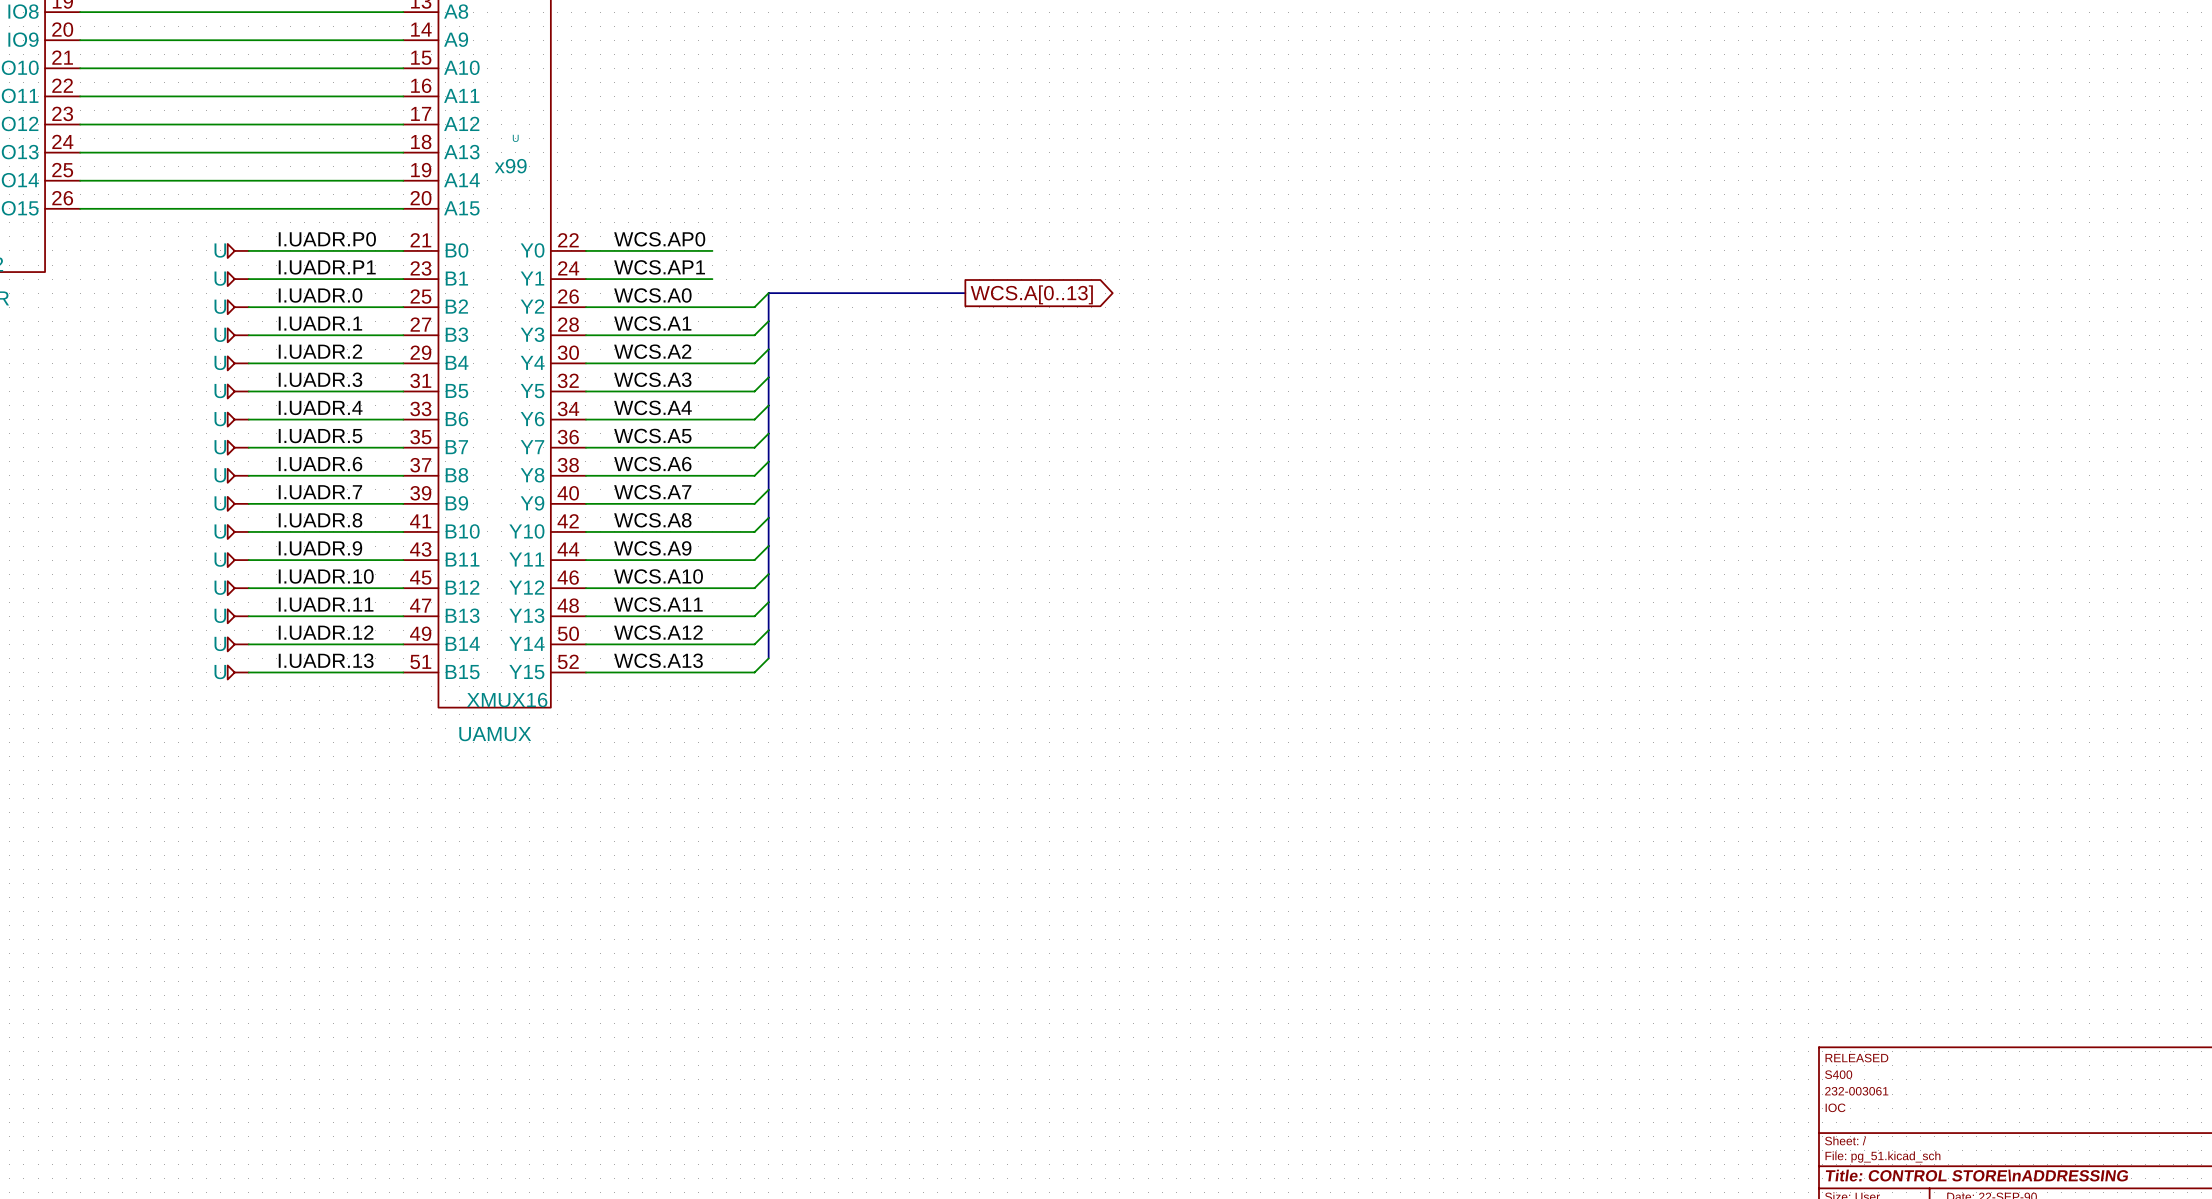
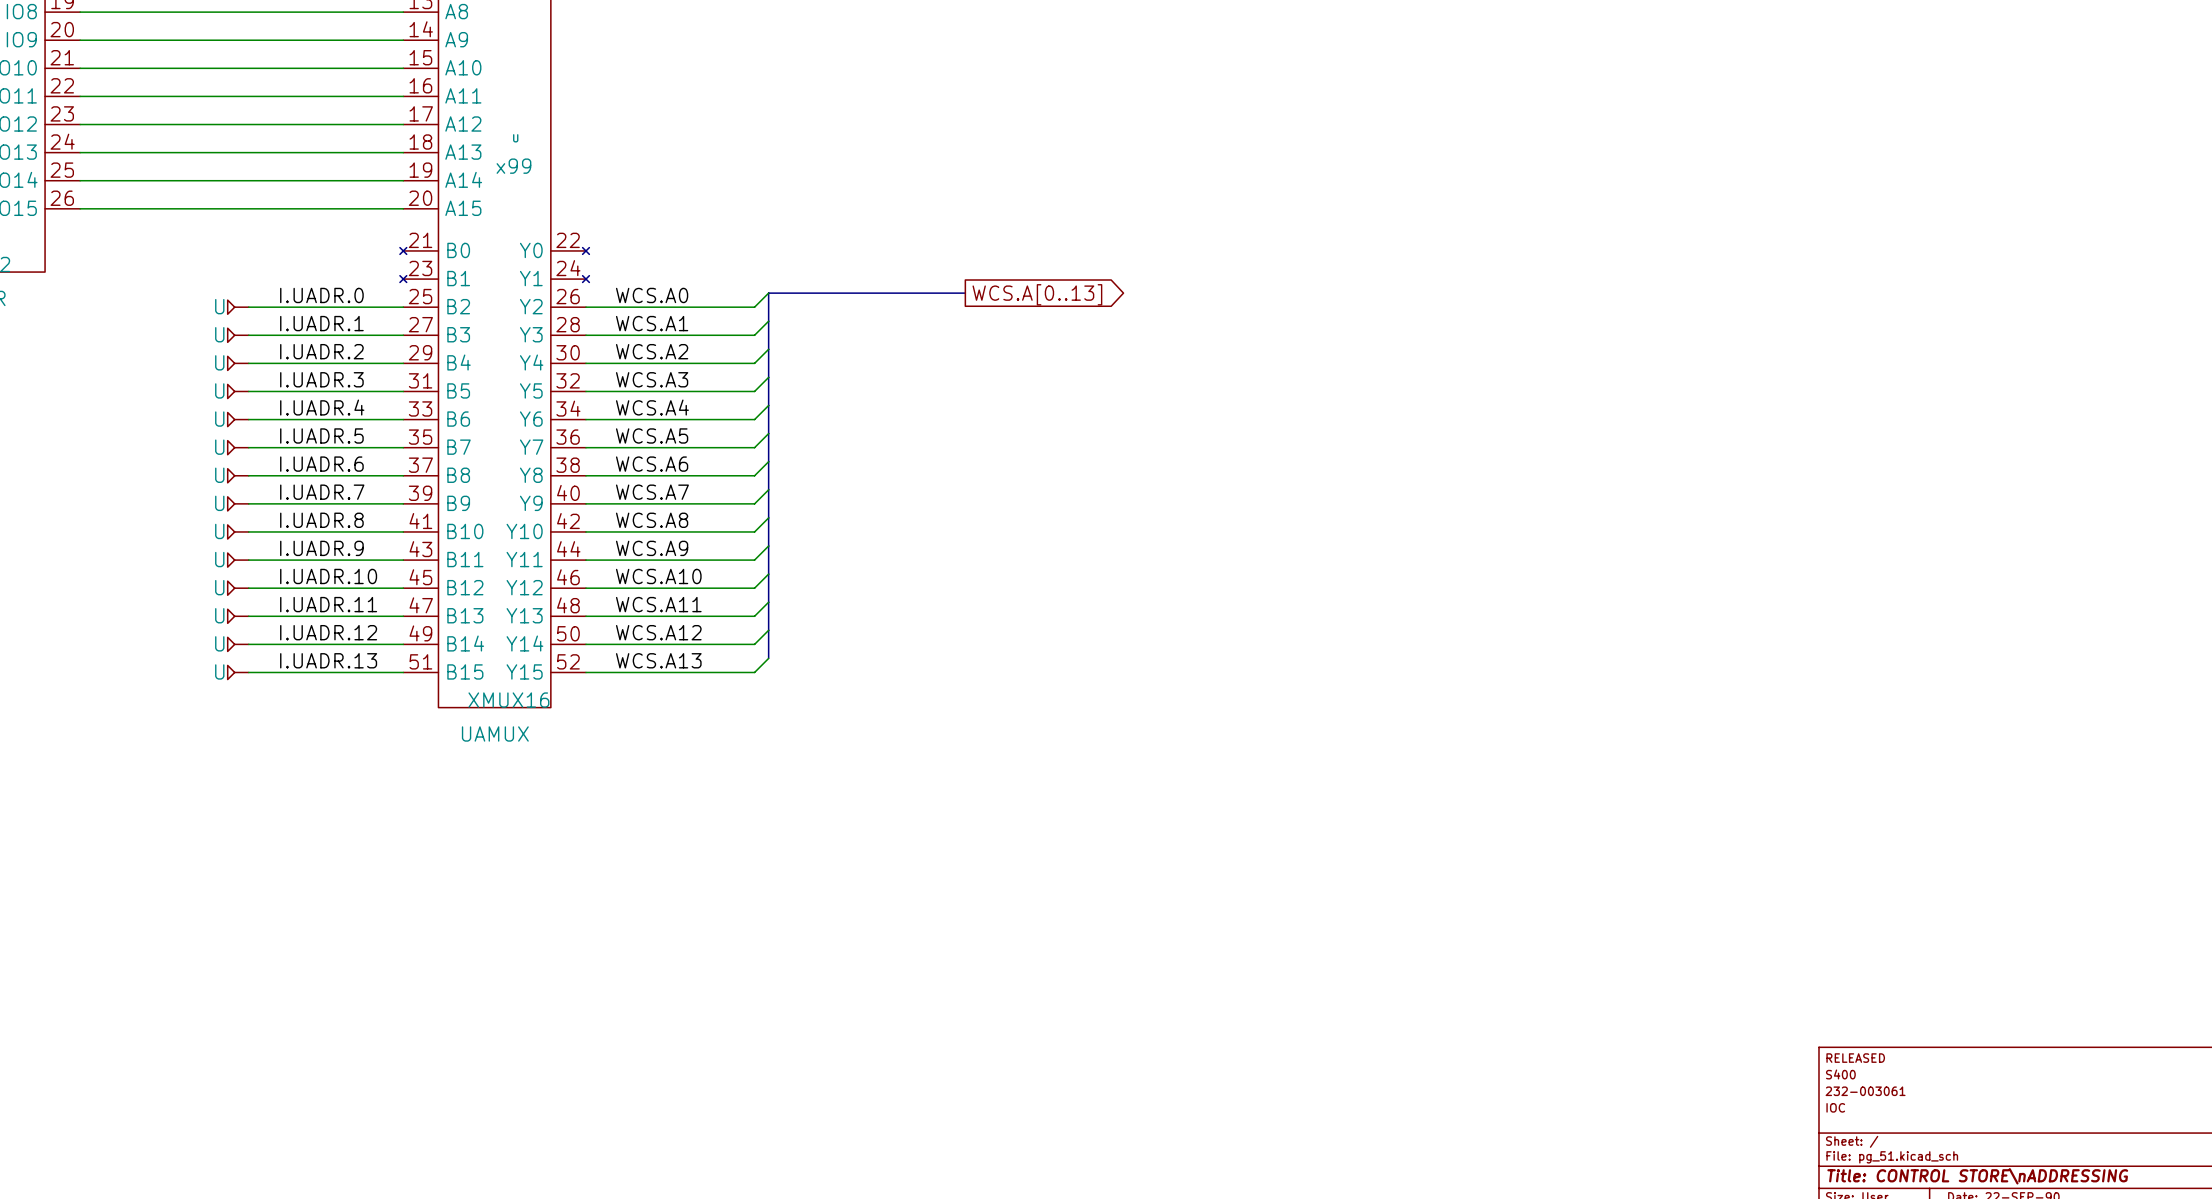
label: I.UADR.P0 (327, 239) -> none
label: WCS.AP0 (659, 239) -> none
U: (238, 250) -> none
wire: (248, 250) (403, 250) -> none
no-connect mark: none -> (403, 250)
wire: (585, 250) (712, 250) -> none
no-connect mark: none -> (585, 250)
label: I.UADR.P1 (327, 267) -> none
label: WCS.AP1 (659, 267) -> none
U: (238, 279) -> none
wire: (248, 279) (403, 279) -> none
no-connect mark: none -> (403, 279)
wire: (585, 279) (712, 279) -> none
no-connect mark: none -> (585, 279)

